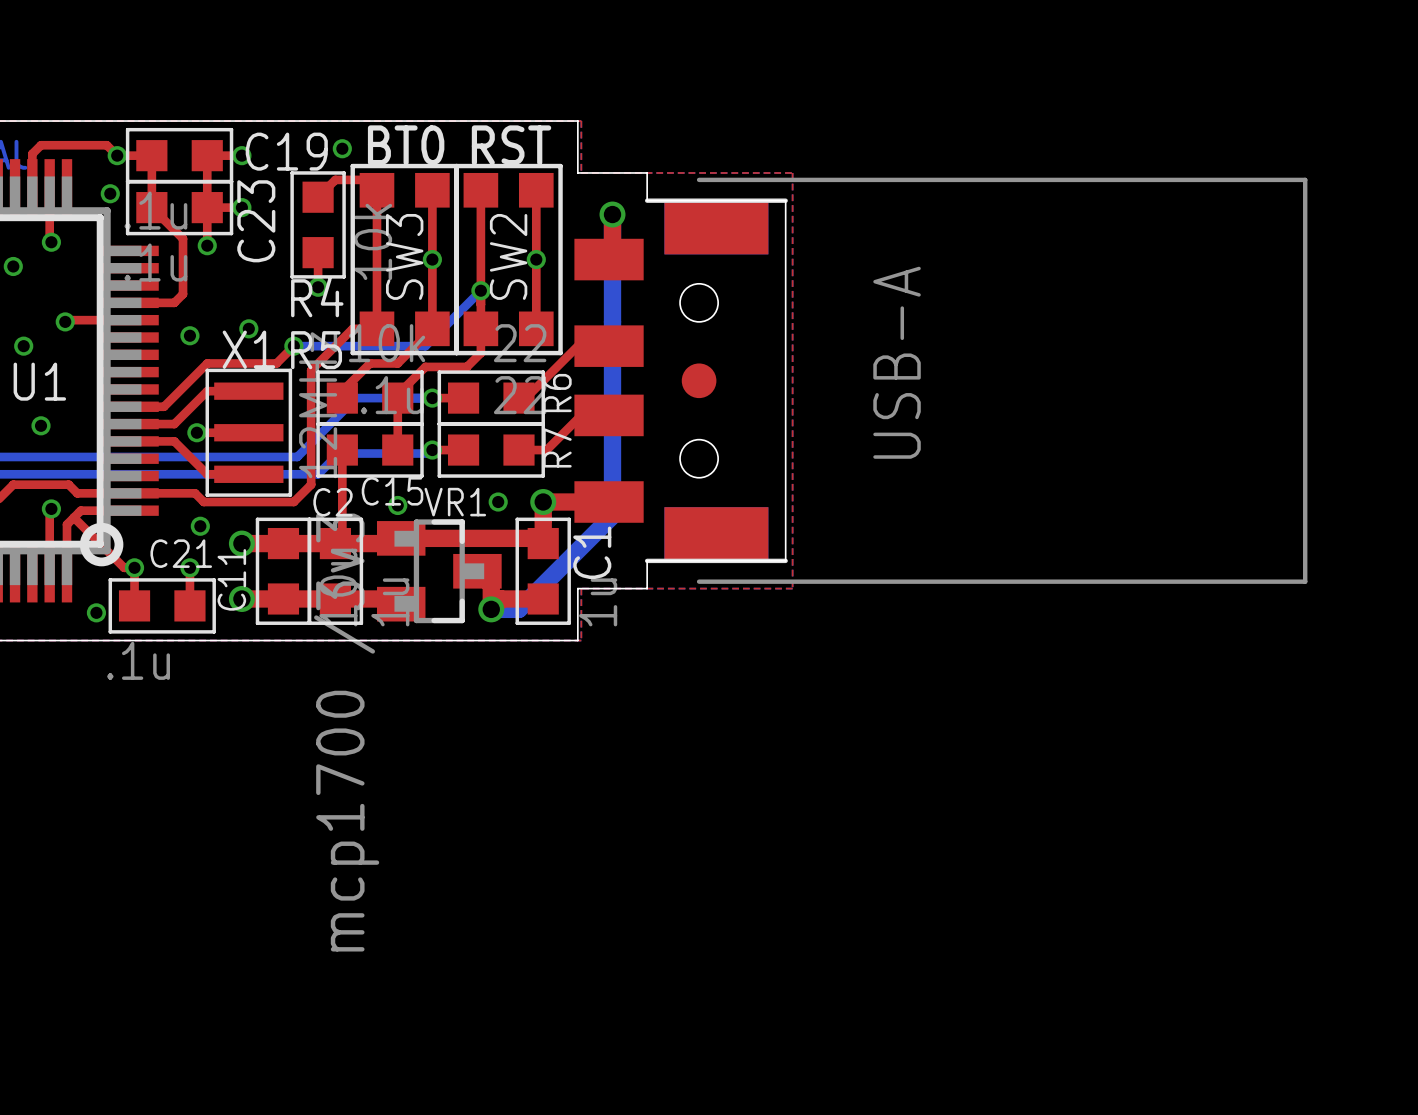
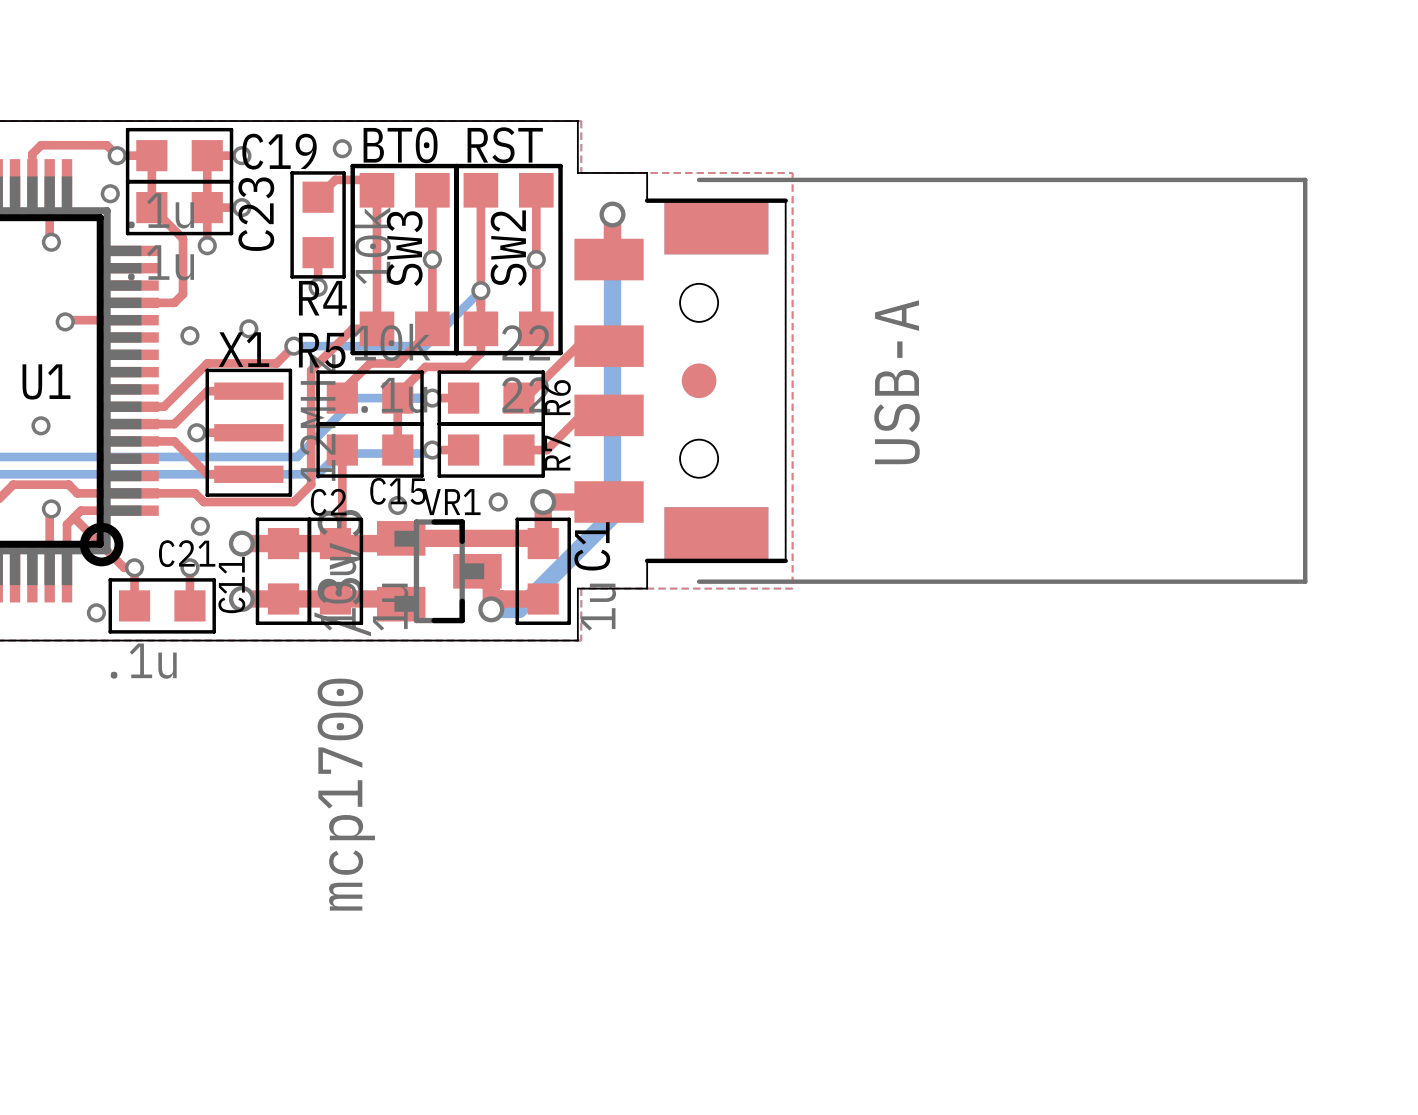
via: (13, 266) -> none
via: (23, 346) -> none

